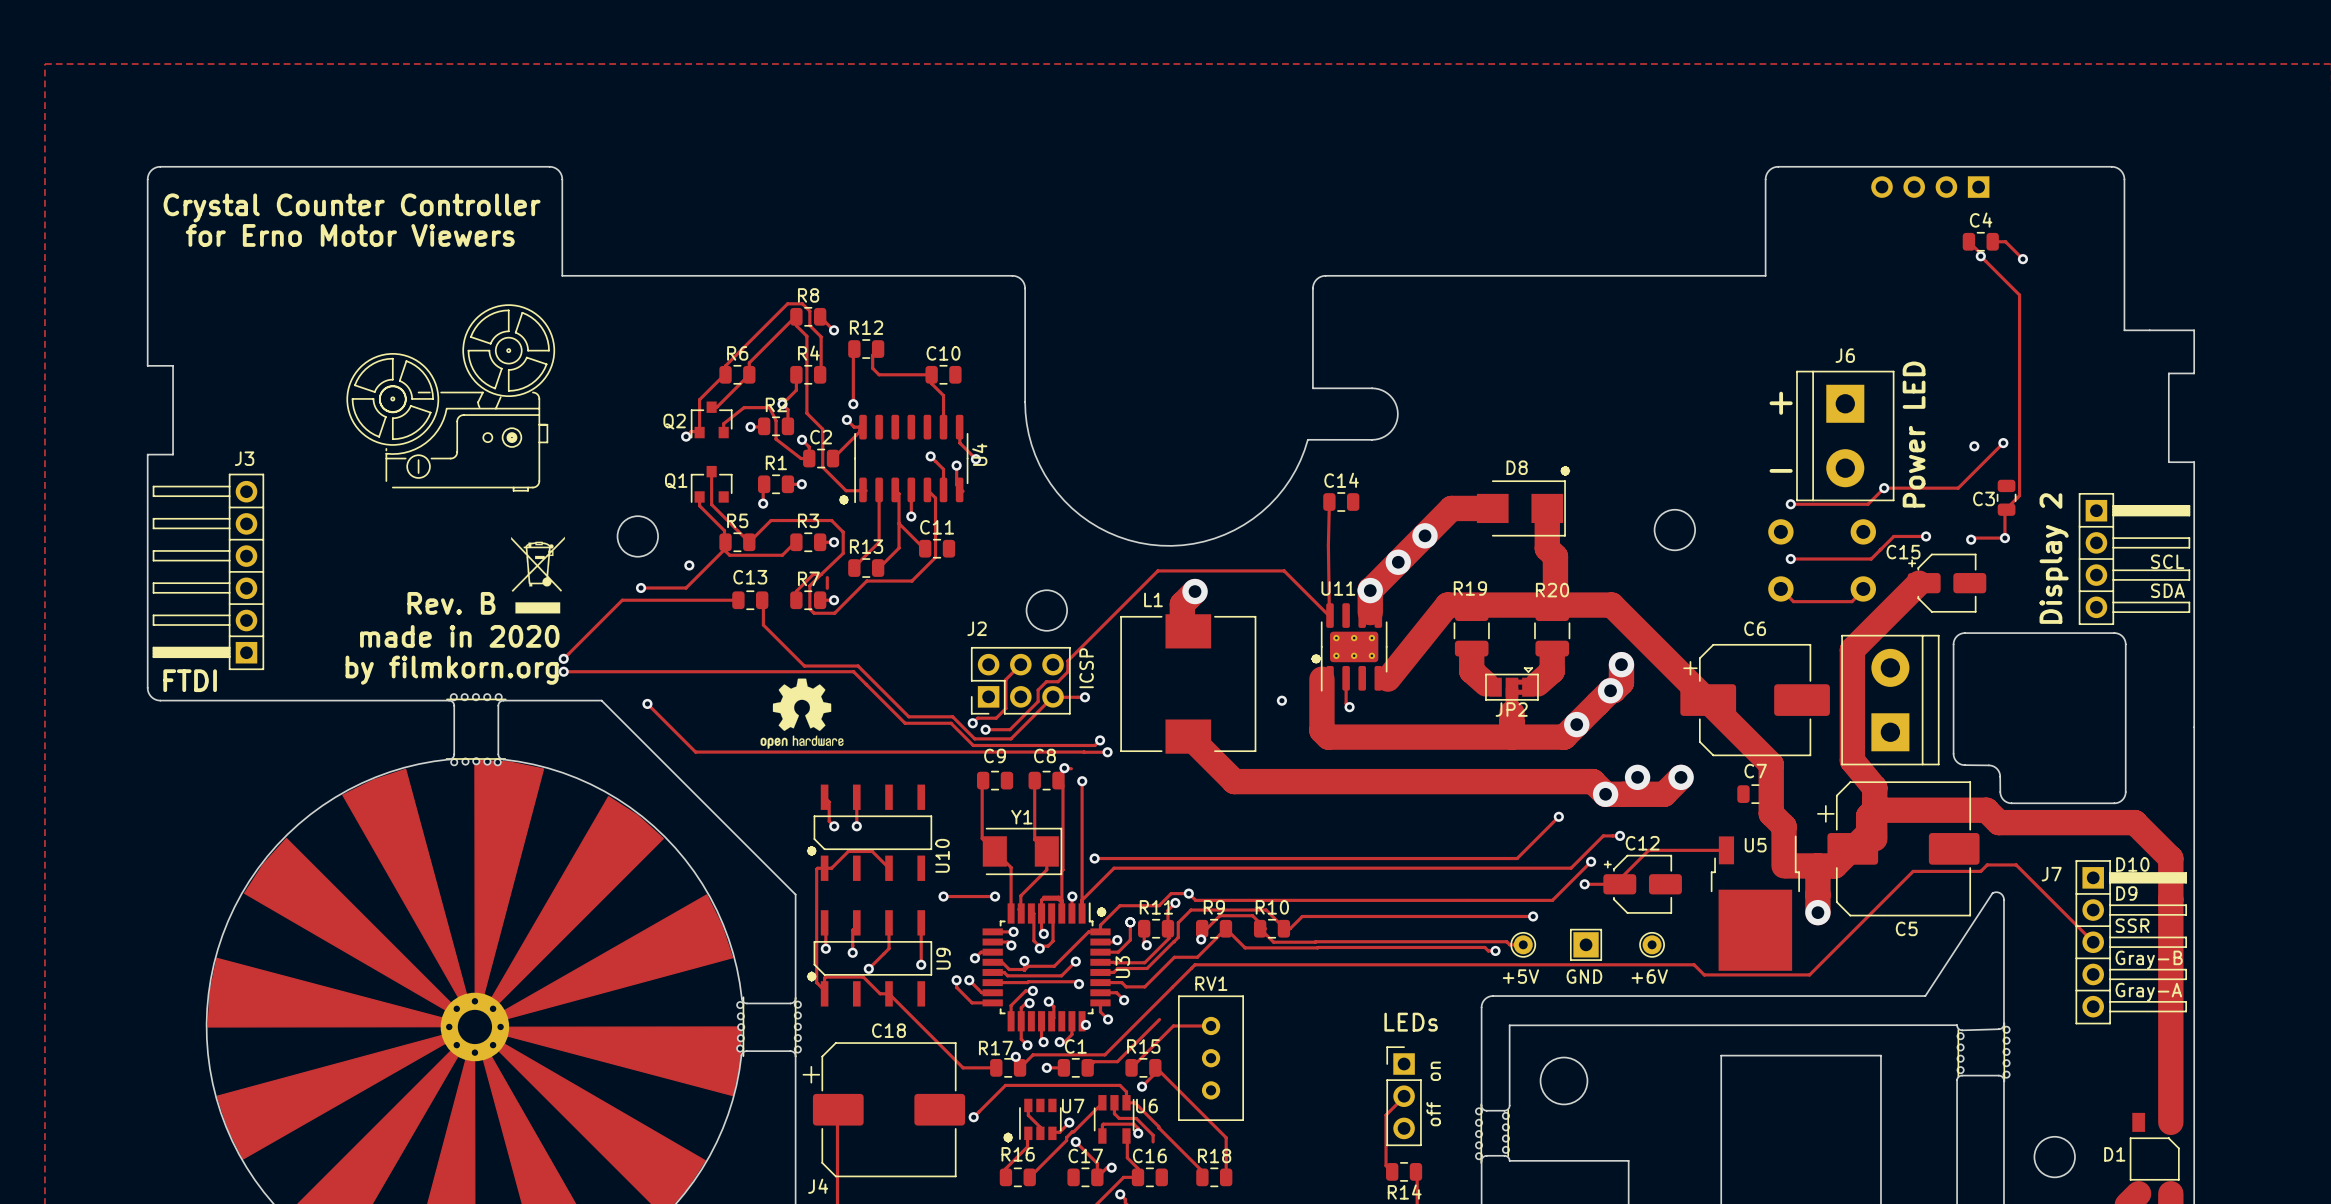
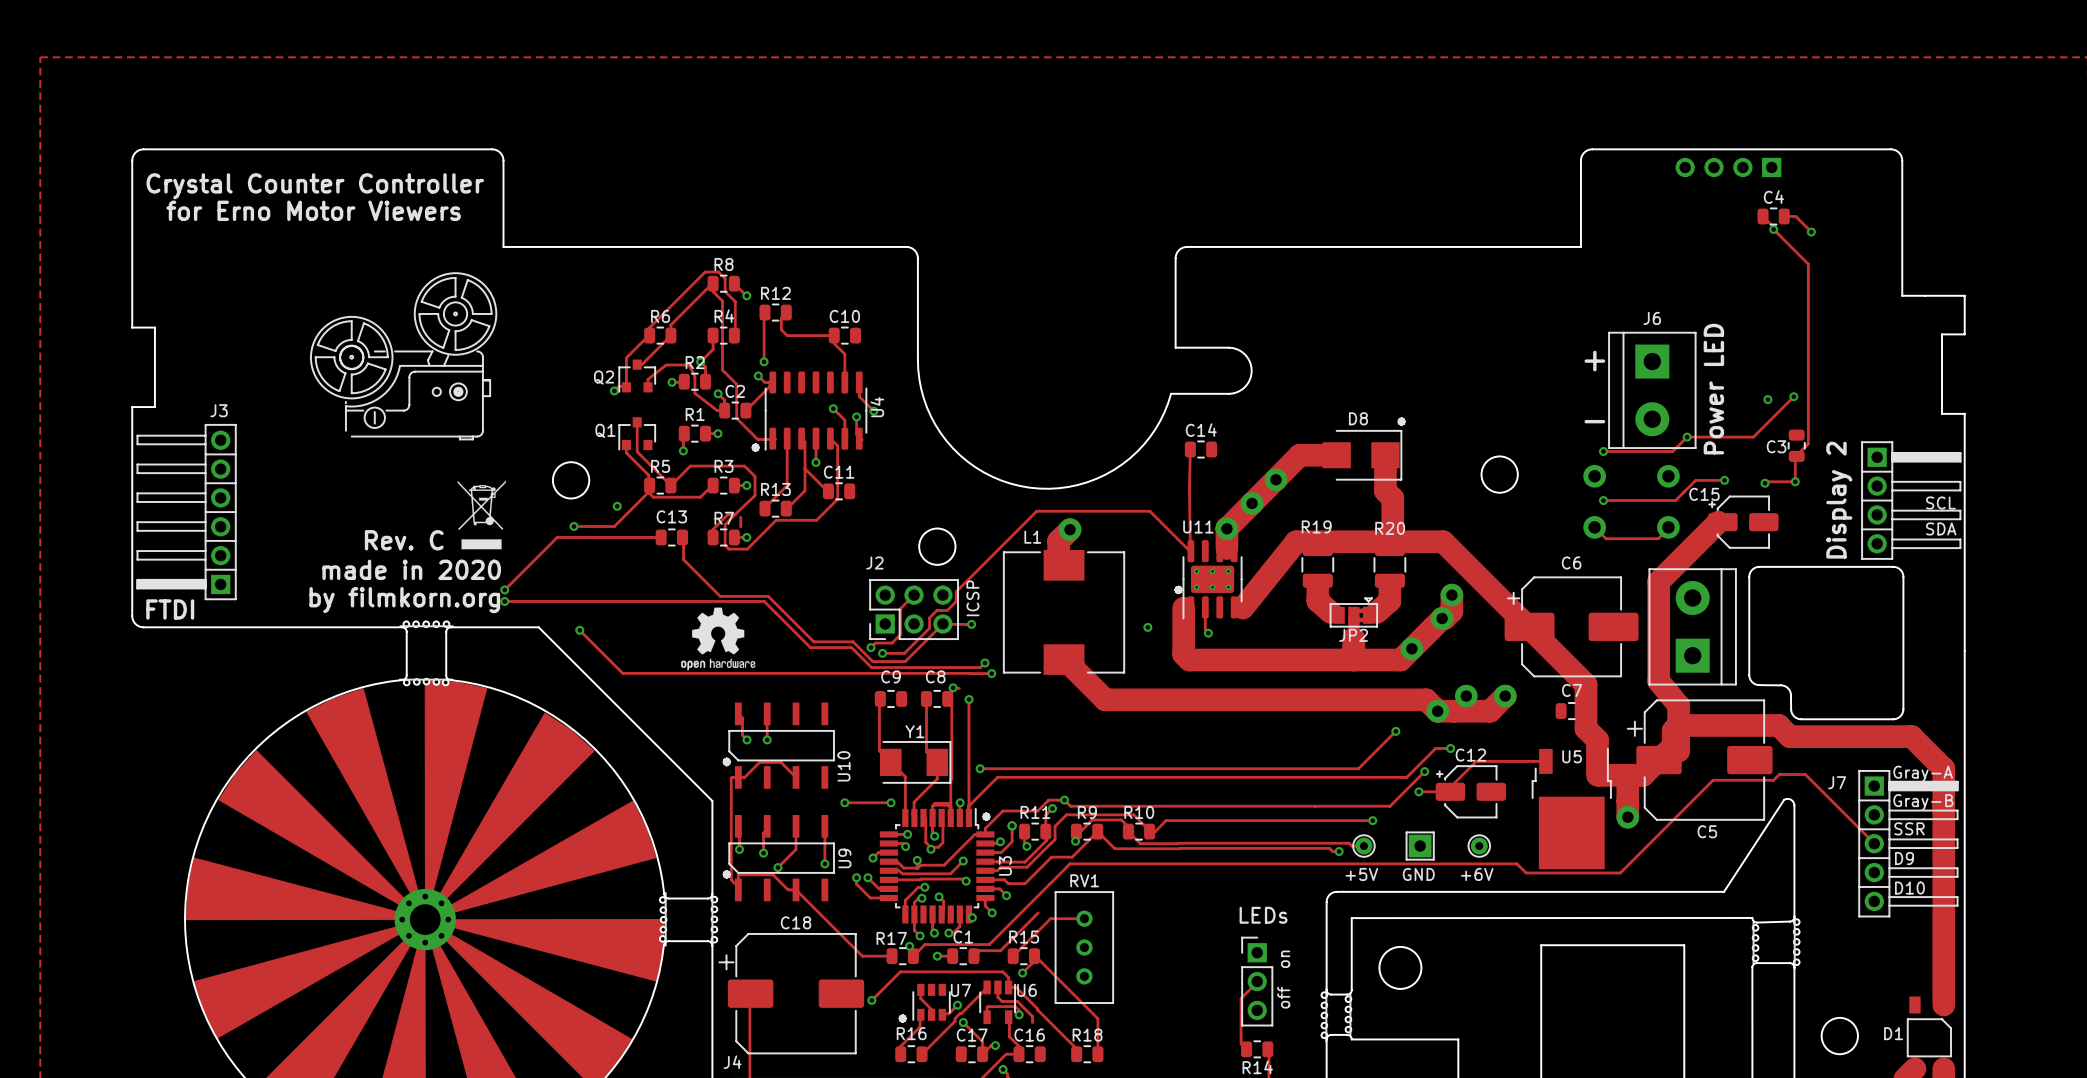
text: Rev. B (451, 603) -> Rev. C (404, 540)
text: D10 (2132, 864) -> Gray-A (1923, 774)
text: D9 (2126, 893) -> Gray-B (1923, 802)
text: Gray-B (2149, 960) -> D9 (1904, 858)
text: Gray-A (2148, 992) -> D10 (1909, 888)

